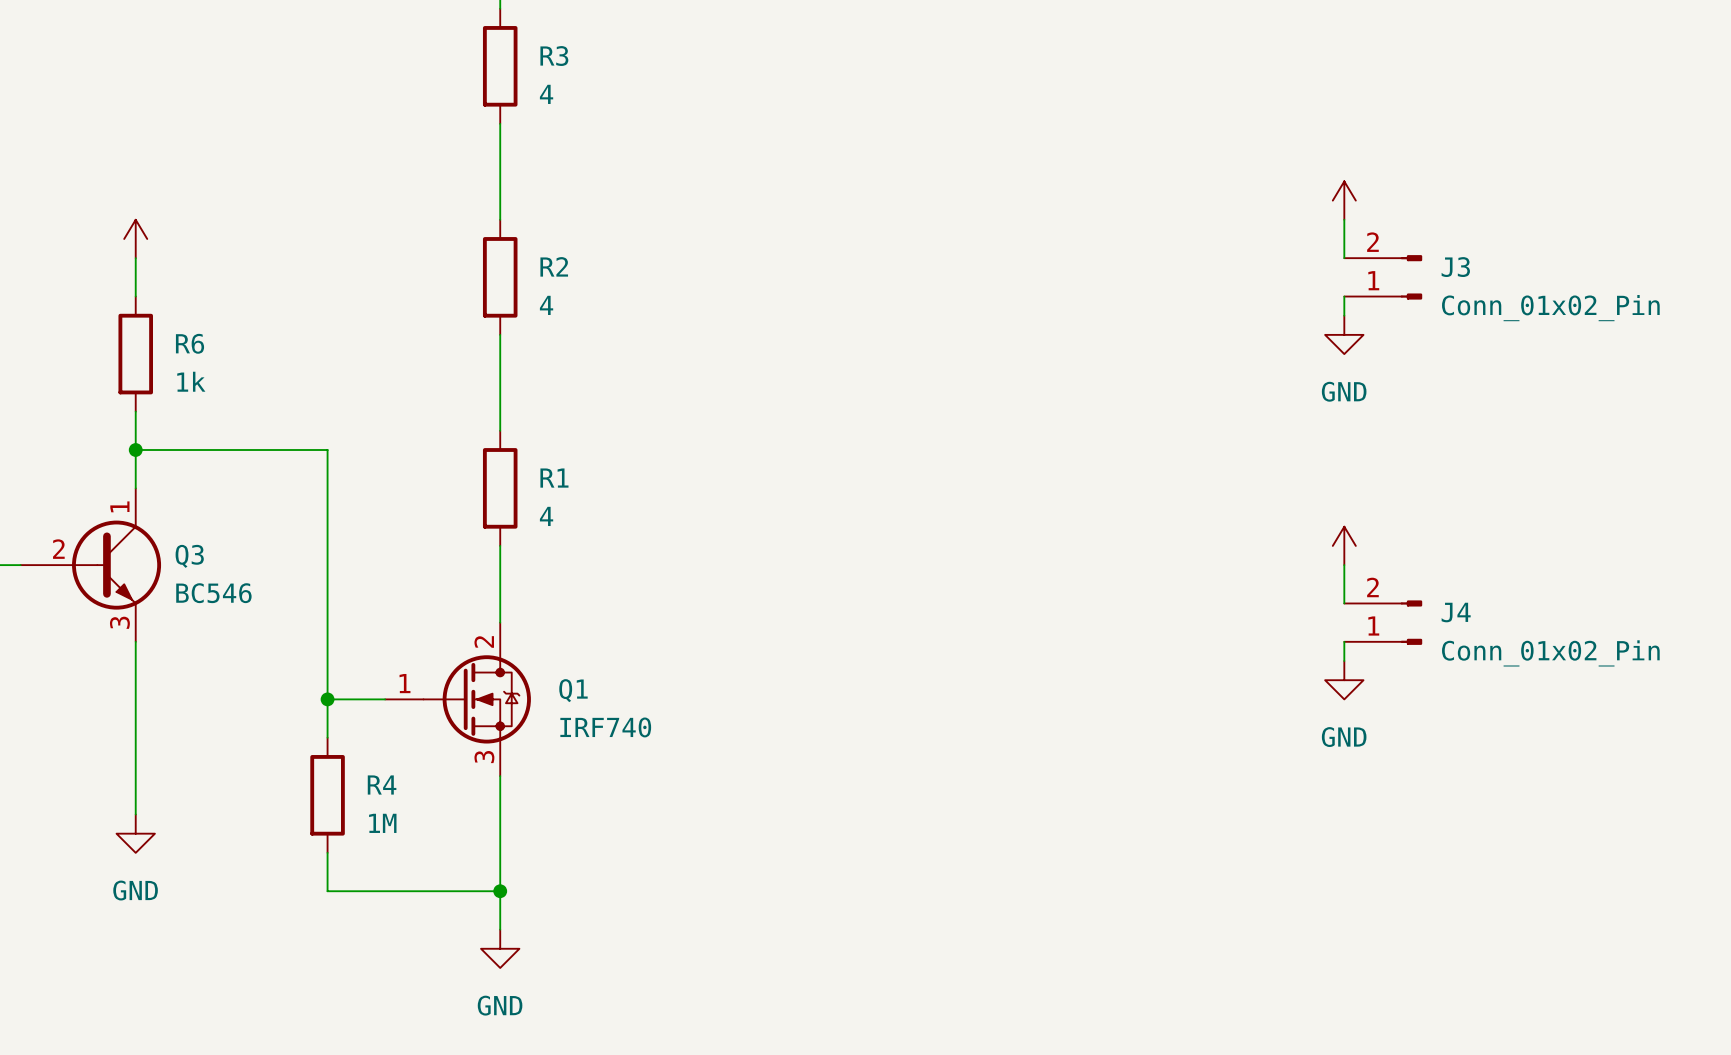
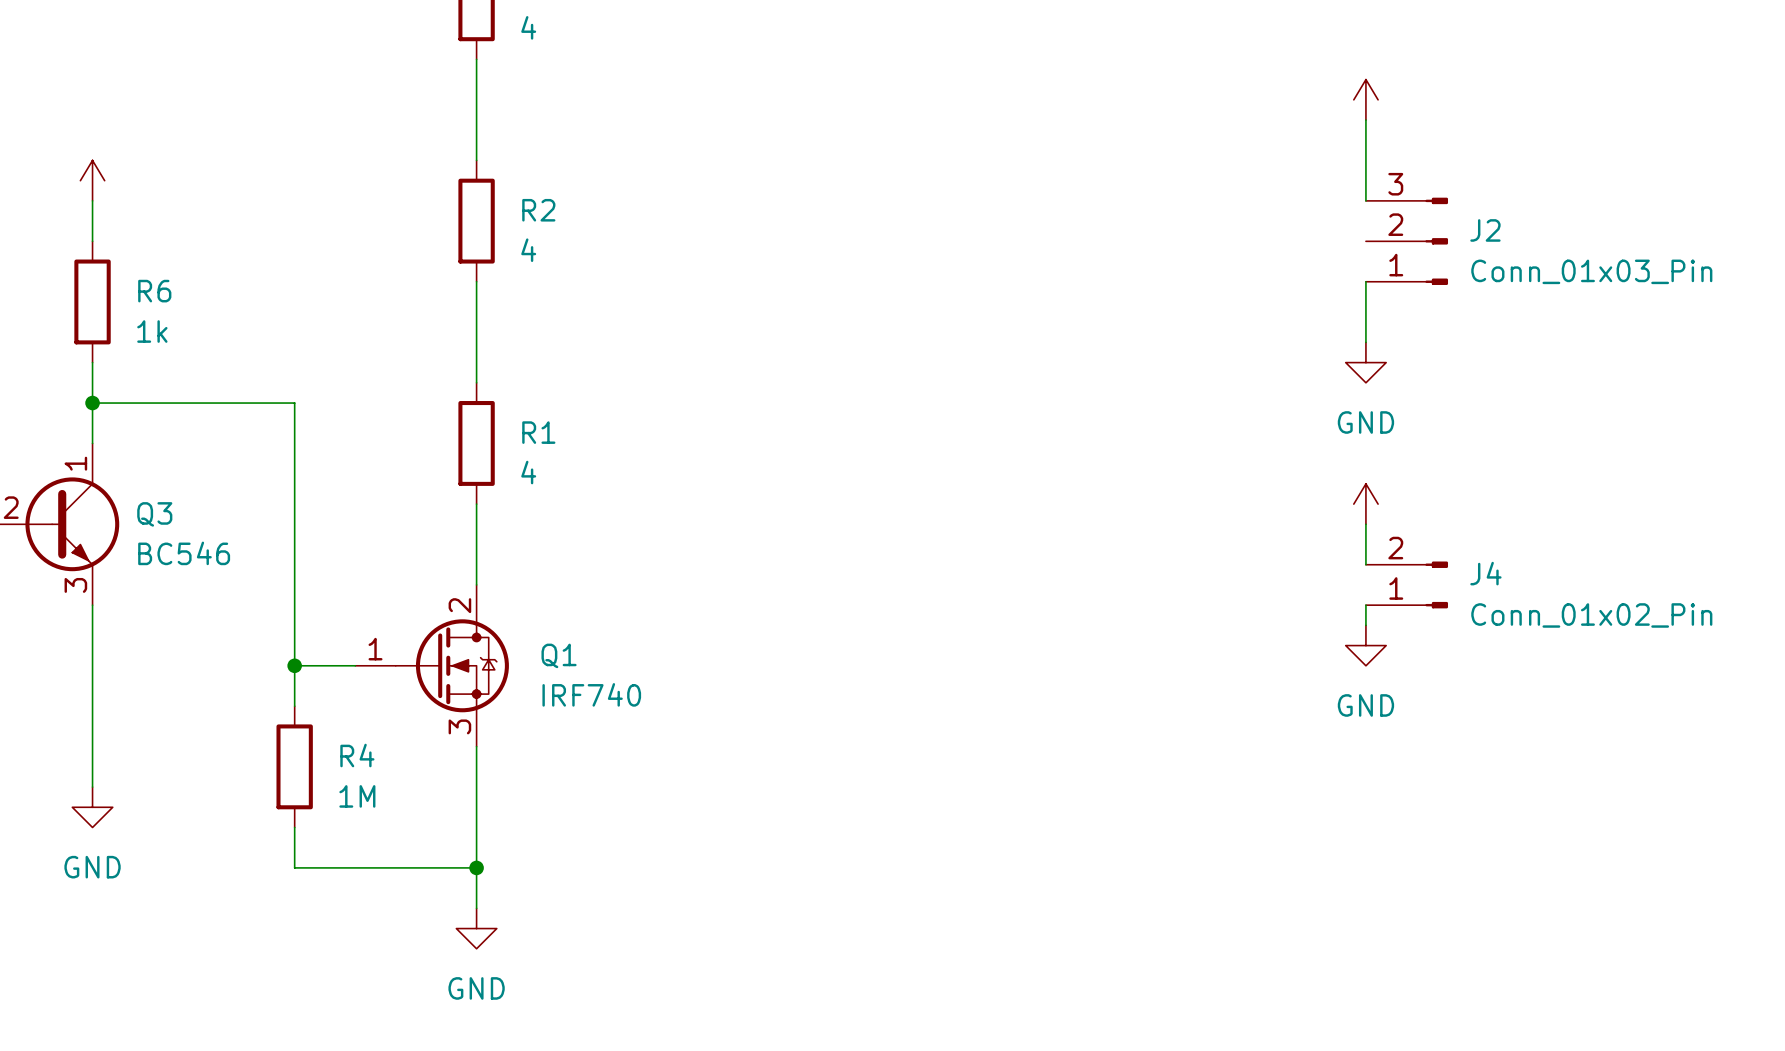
power symbol position: (1344, 200) -> (1365, 99)
J3: Conn_01x02_Pin (1383, 277) -> none
wire: (1344, 296) (1344, 315) -> none
J2: none -> Conn_01x03_Pin (1406, 241)
wire: none -> (1365, 281) (1365, 342)
power symbol position: GND (1344, 334) -> GND (1365, 362)

